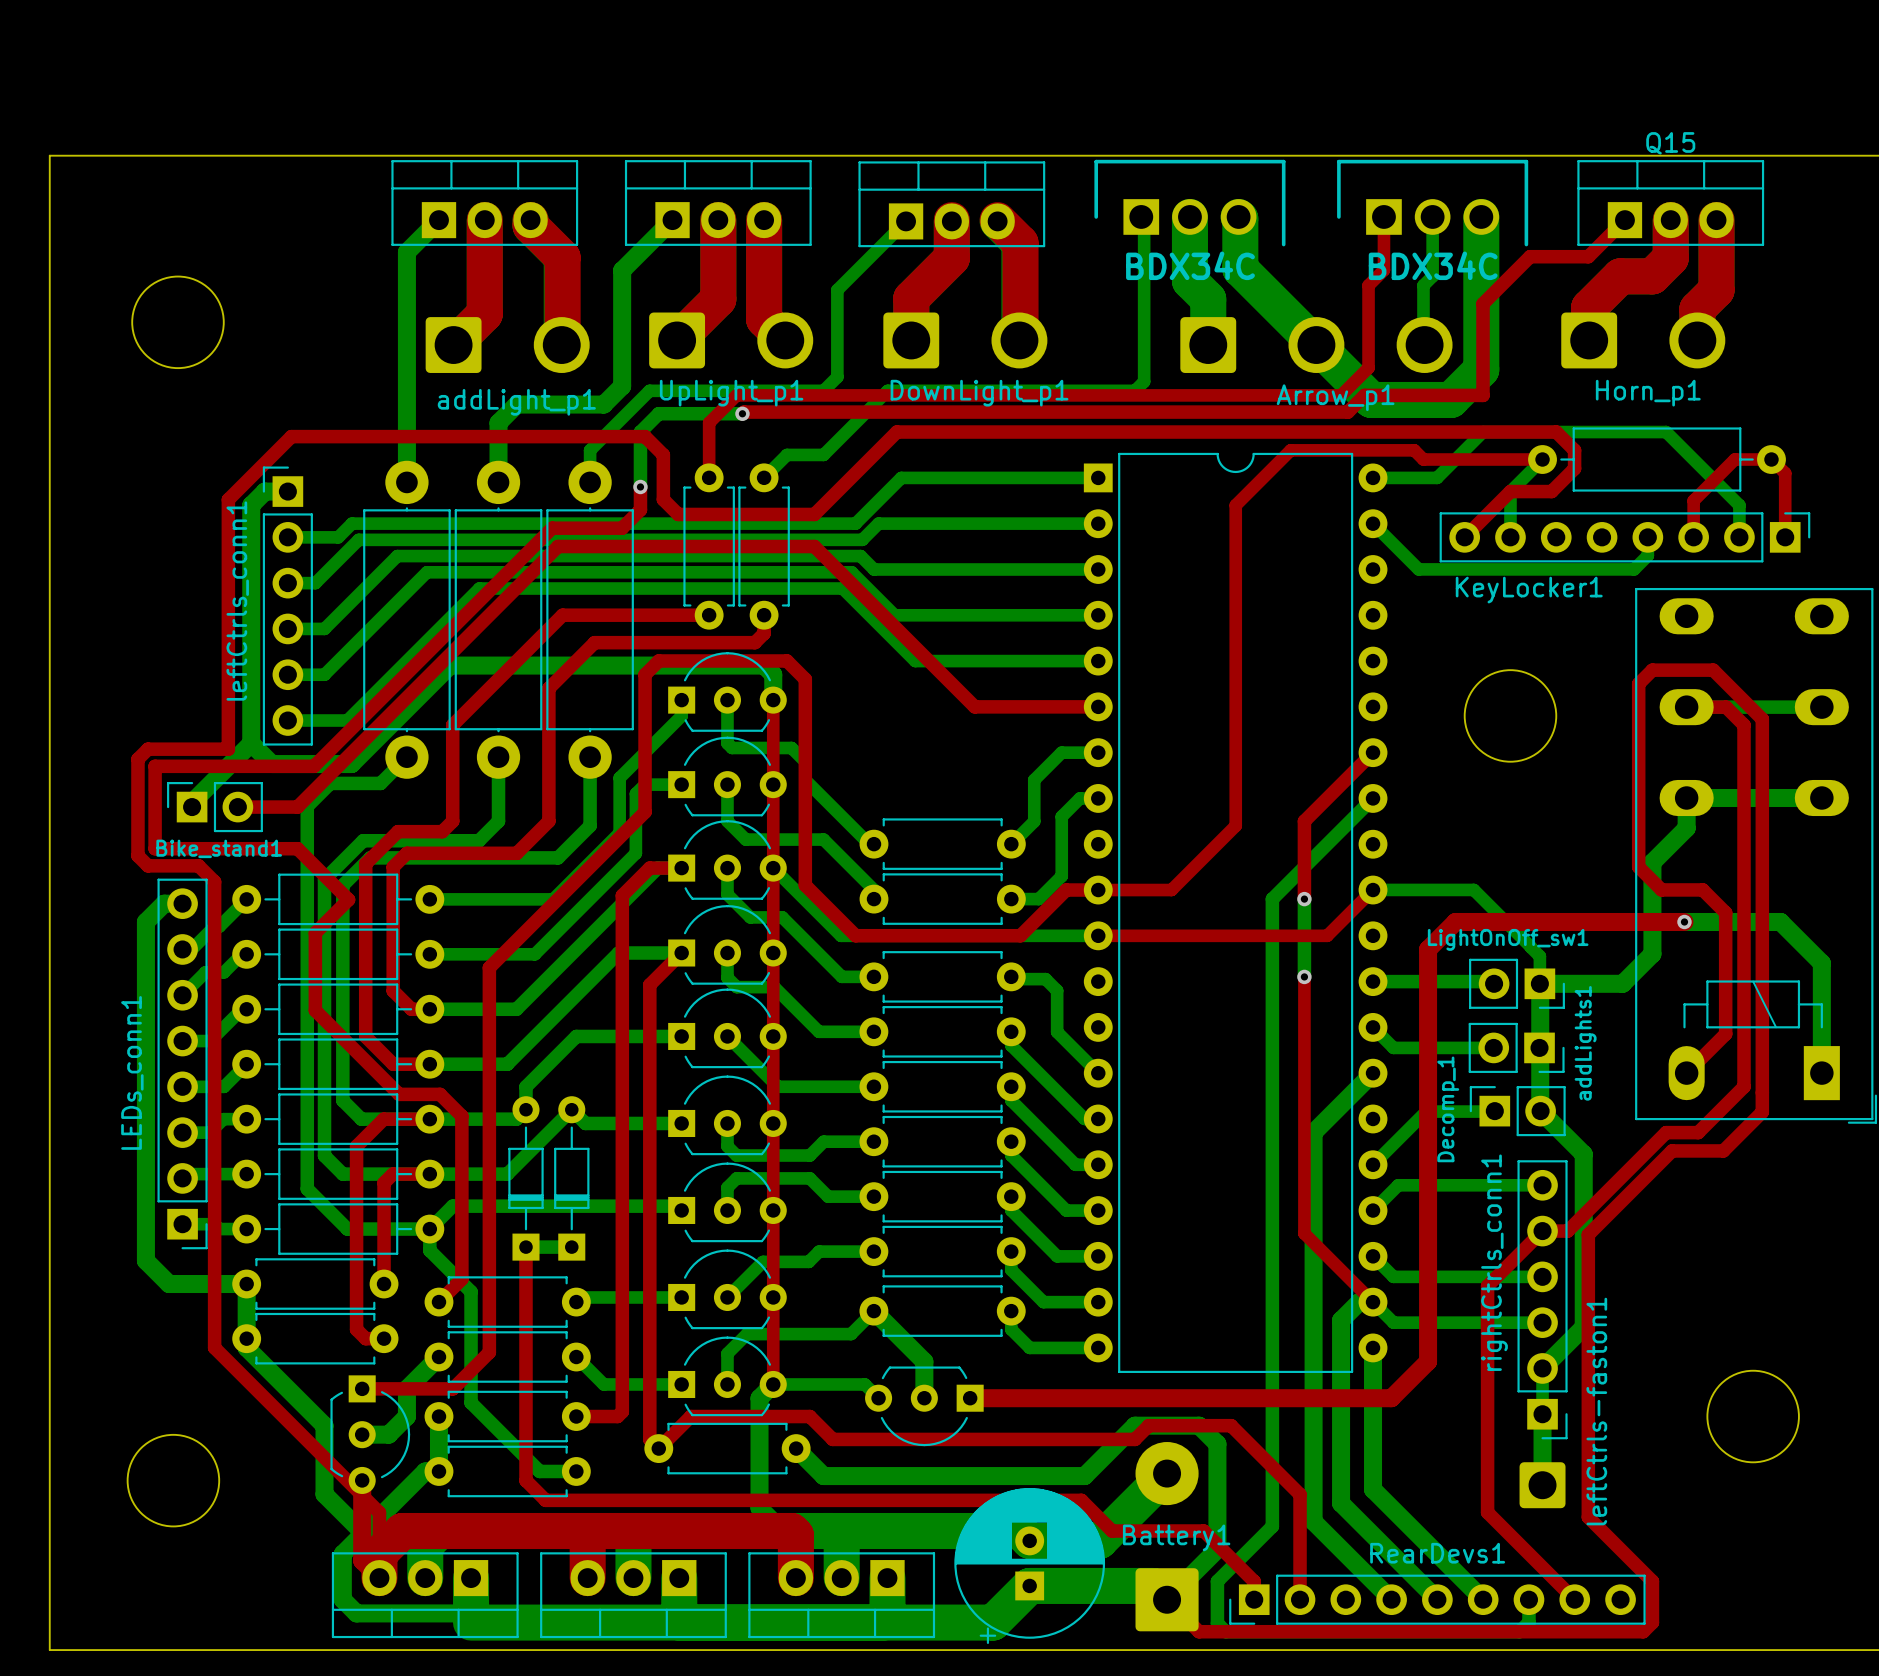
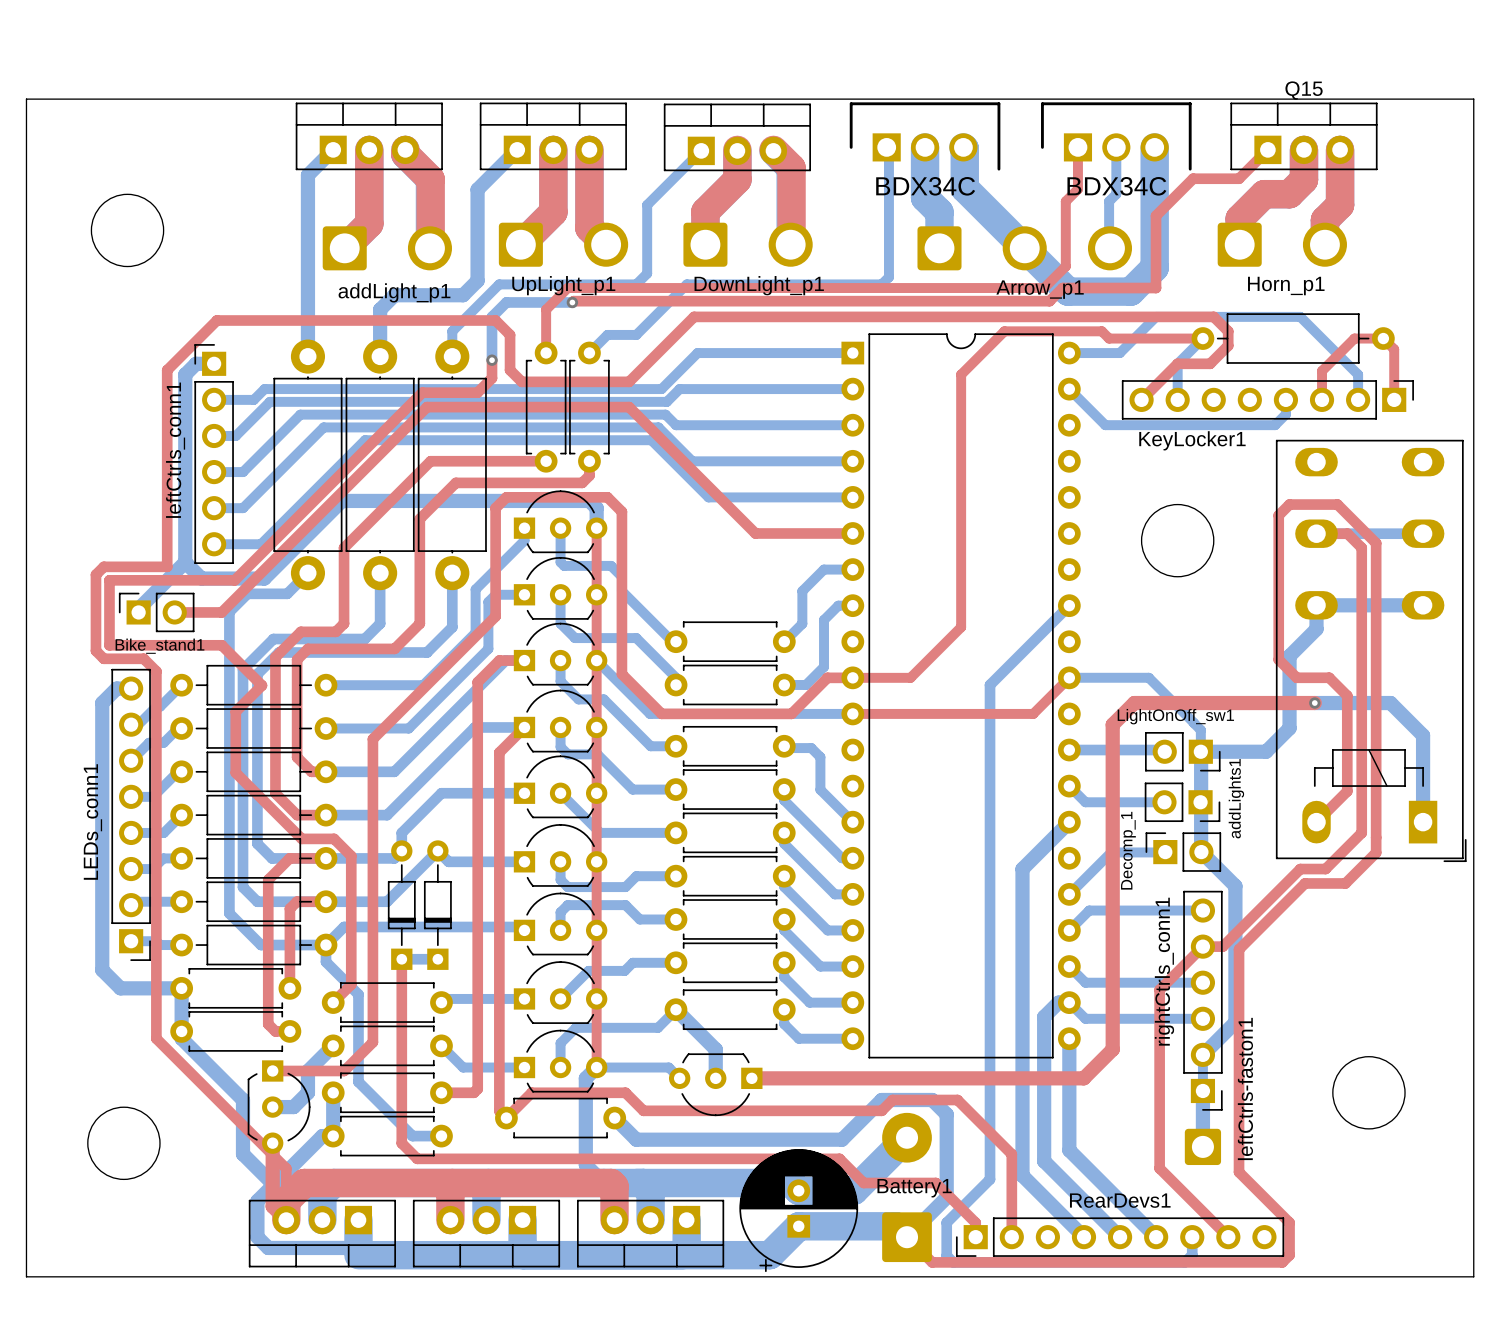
top track: (1373, 752) (1304, 821) (1304, 899) -> none
bottom track: (1304, 899) (1304, 976) -> none
via: (1304, 899) -> none
top track: (1304, 976) (1304, 1233) (1373, 1302) -> none
via: (1304, 976) -> none

